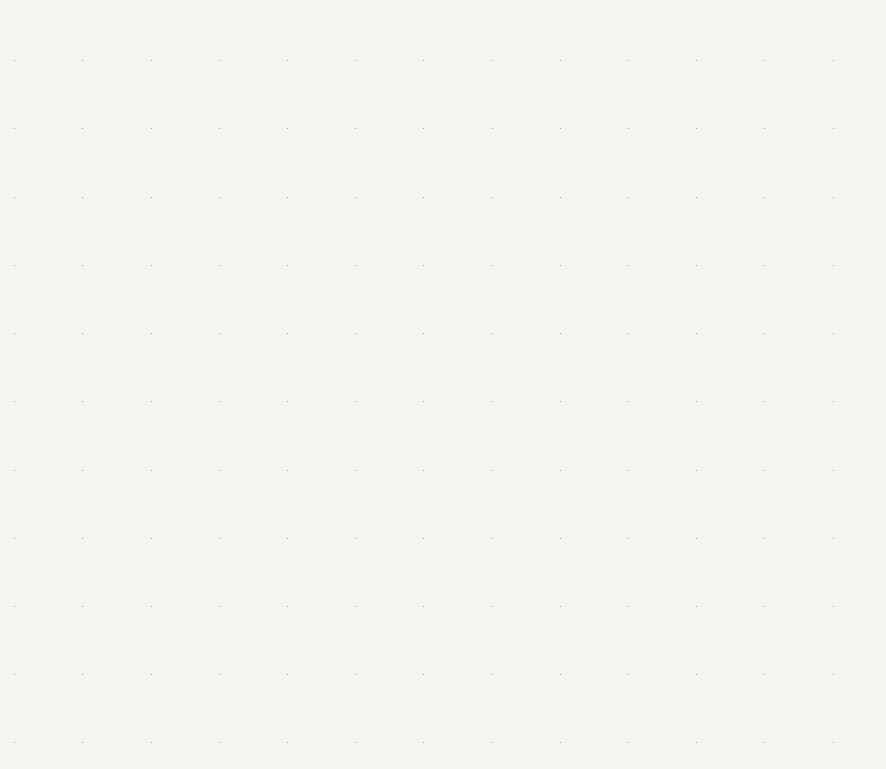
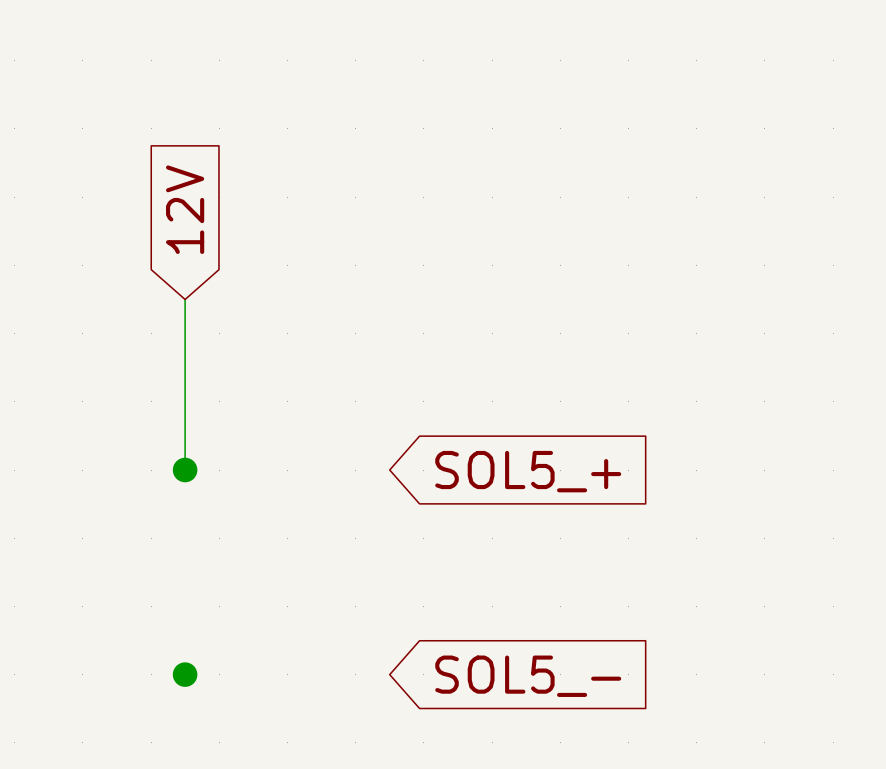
global label: none -> 12V (185, 209)
wire: none -> (185, 299) (185, 470)
junction: none -> (185, 470)
global label: none -> SOL5_+ (528, 471)
junction: none -> (185, 674)
global label: none -> SOL5_- (528, 676)

